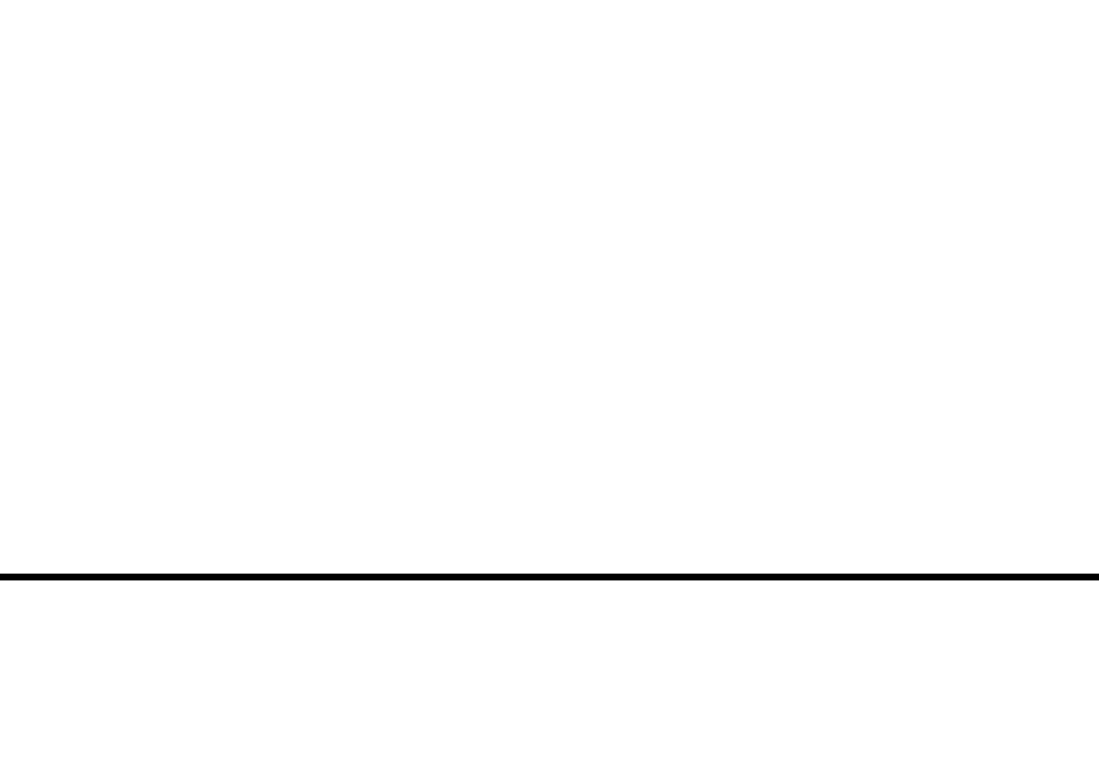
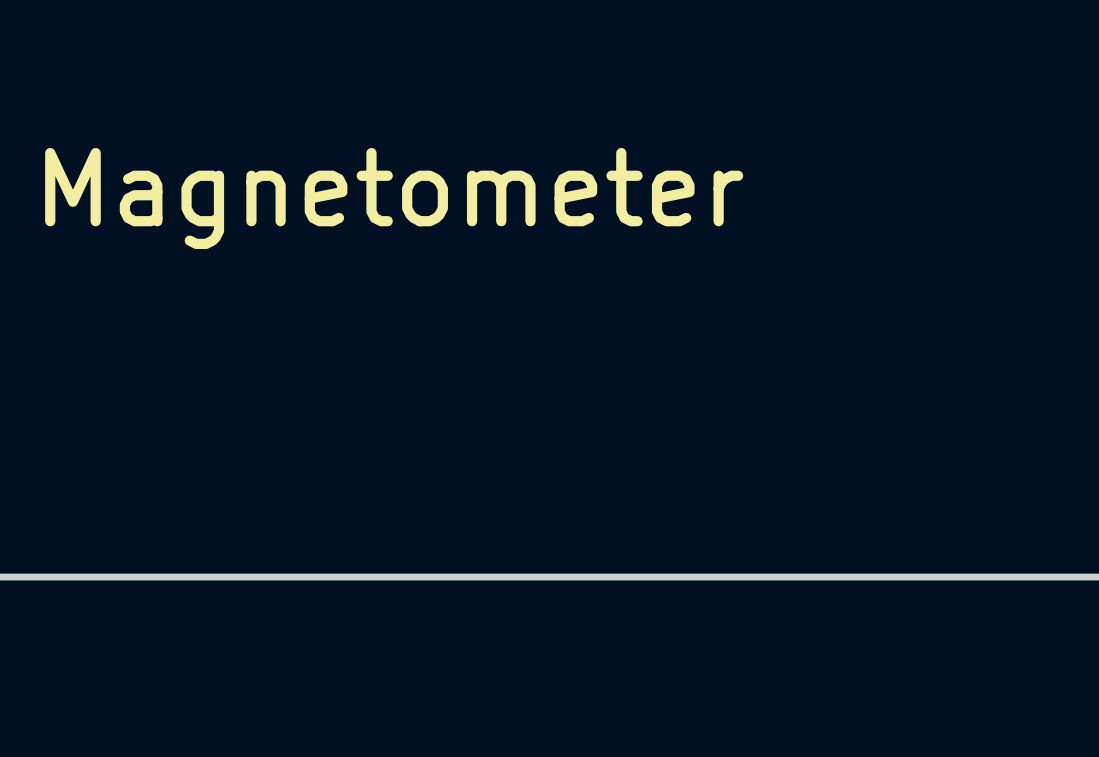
text: none -> Magnetometer (394, 198)

